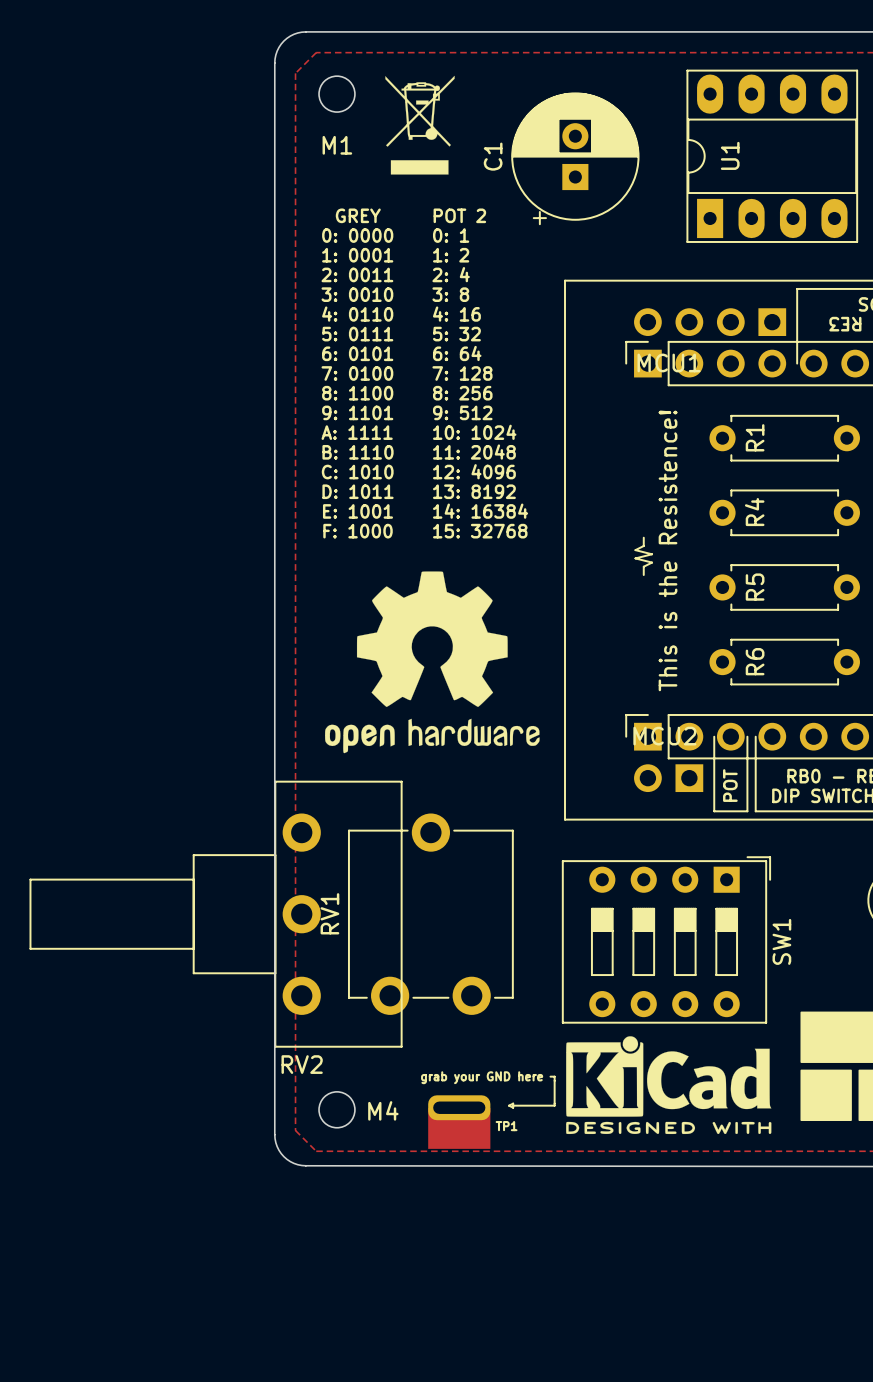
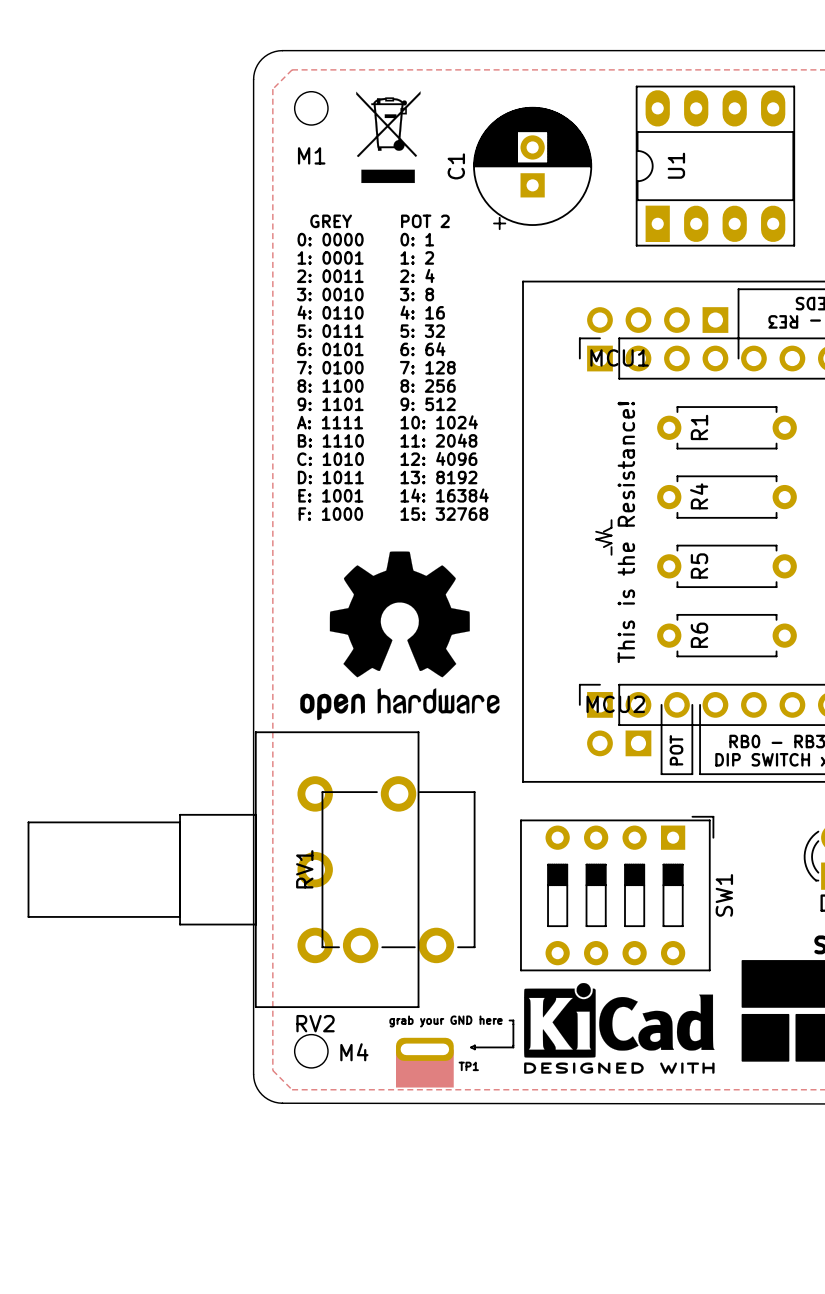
line: (643, 537) (643, 545) (635, 550) (652, 554) (635, 558) (652, 562) (643, 566) (643, 575) -> none
line: none -> (611, 520) (611, 527) (603, 531)
line: none -> (596, 531) (611, 535) (596, 539) (611, 543) (603, 547)
text: This is the Resistence! (668, 550) -> This is the Resistance! (626, 532)
line: none -> (611, 547) (611, 554)
RV2 footprint: [29, 780, 403, 1048] -> [27, 731, 420, 1009]

